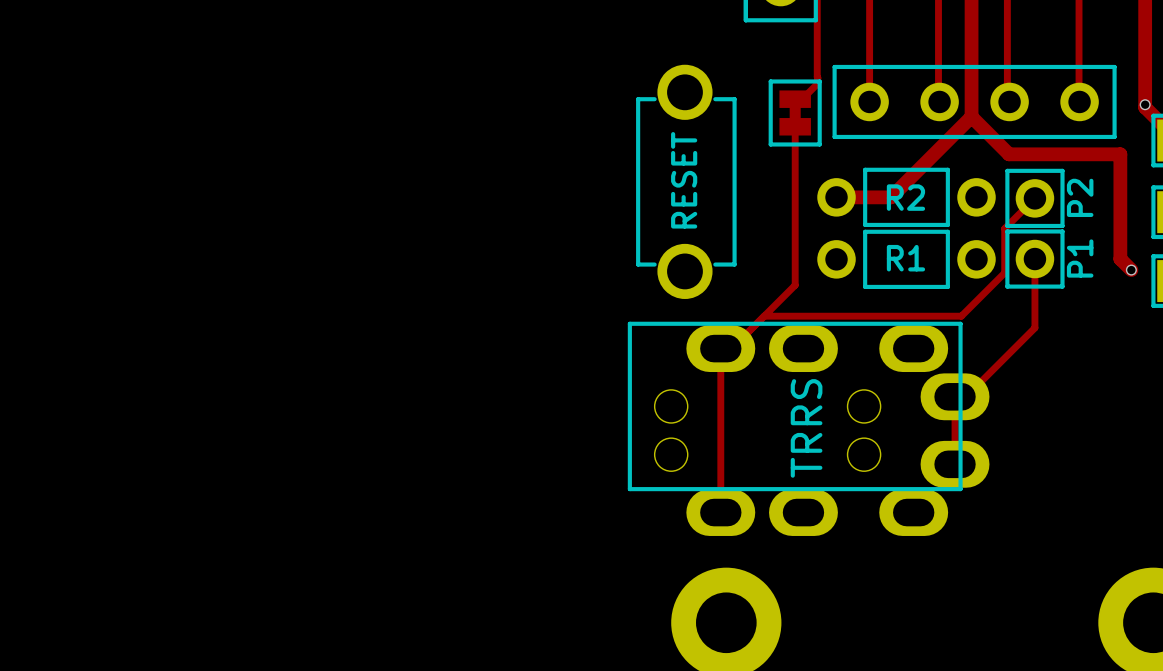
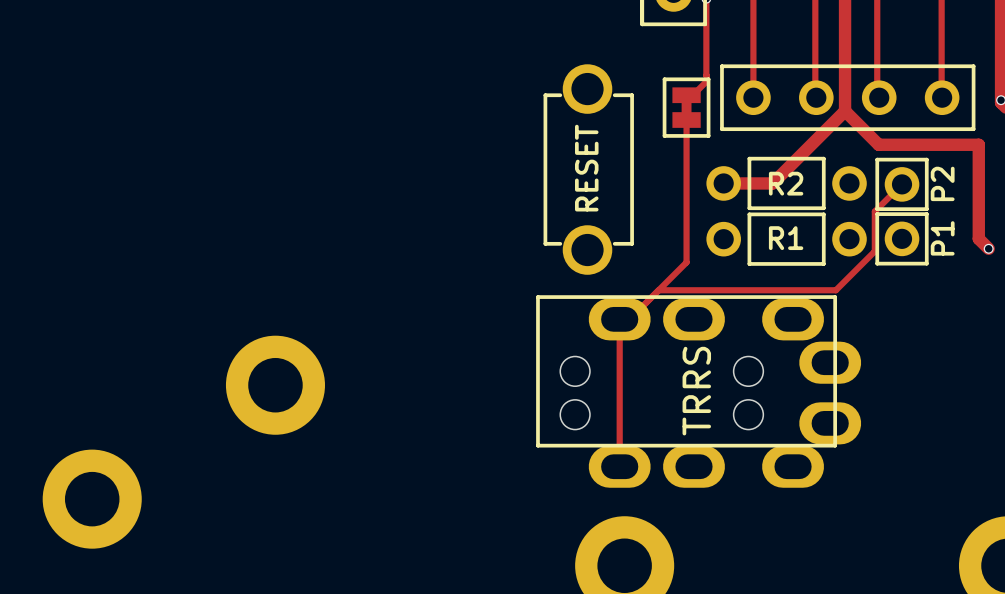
track: (1034, 259) (1034, 327) (966, 396) (955, 396) (955, 464) -> none
part: none -> (275, 385)
part: none -> (92, 499)

